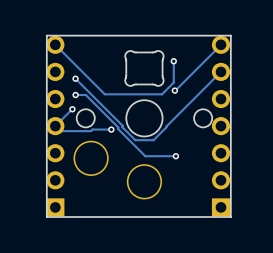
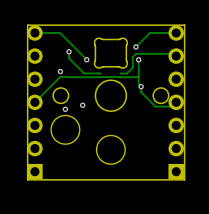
track: none -> (35, 32) (60, 32) (86, 59)
track: none -> (176, 32) (149, 32) (136, 46)
track: (60, 49) (104, 94) (162, 94) (173, 82) (173, 61) -> none
track: (214, 51) (174, 90) -> none
track: none -> (69, 51) (69, 58) (84, 73) (100, 73)
via: none -> (69, 51)
track: (214, 71) (214, 78) (153, 140) (135, 140) (75, 78) -> none
track: none -> (176, 56) (173, 53) (136, 53) (132, 57) (132, 67) (126, 73) (120, 73)
via: none -> (86, 59)
track: none -> (138, 59) (138, 84) (141, 86) (141, 92) (155, 106) (171, 106) (176, 102)
via: none -> (138, 59)
via: (75, 78) -> none
via: none -> (60, 71)
via: (174, 90) -> none
track: (75, 94) (85, 94) (145, 156) (175, 156) -> none
via: (75, 94) -> none
track: none -> (138, 77) (60, 76) (49, 87)
via: none -> (141, 86)
via: (72, 109) -> none
track: (55, 126) (60, 131) (111, 129) -> none
via: none -> (65, 109)
via: (175, 156) -> none

